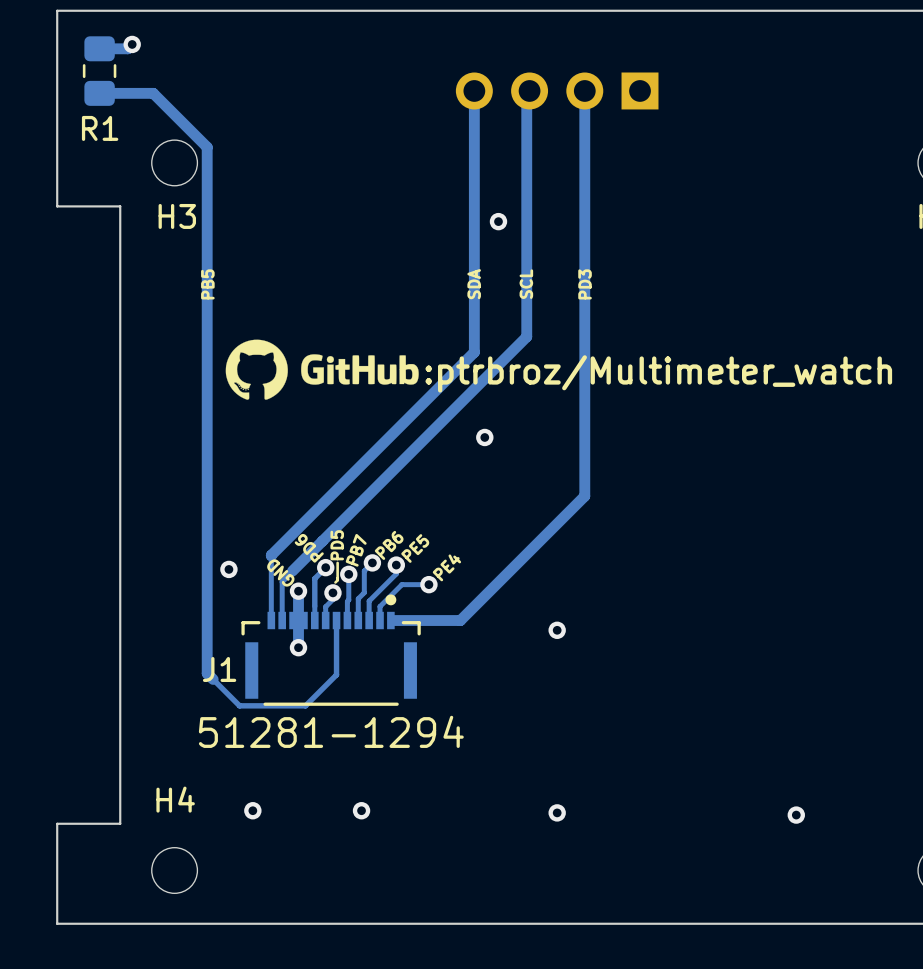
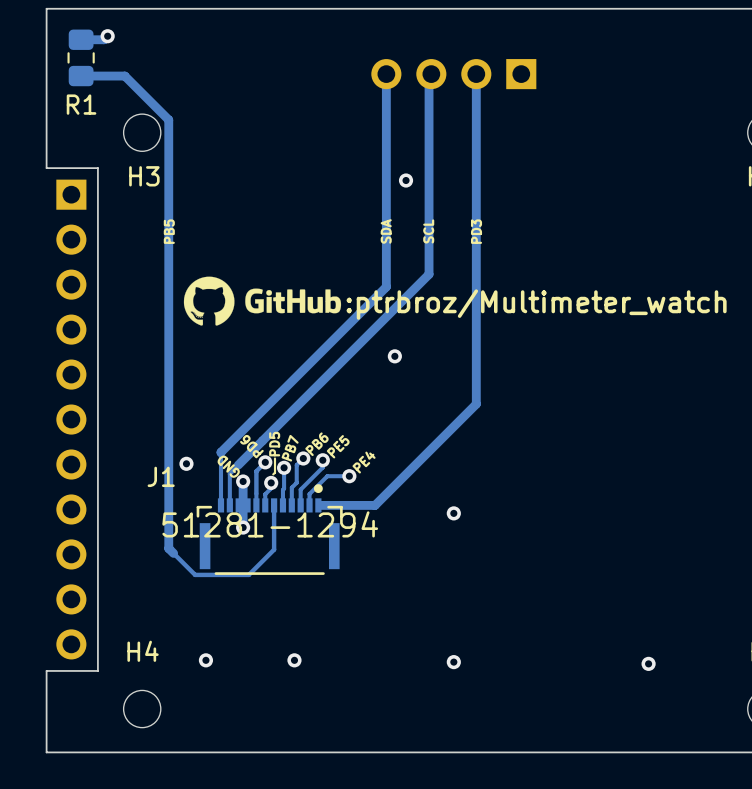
part: none -> (71, 419)
J1 name position: J1 (219, 669) -> J1 (161, 476)
J1 value position: 51281-1294 (331, 731) -> 51281-1294 (270, 524)

